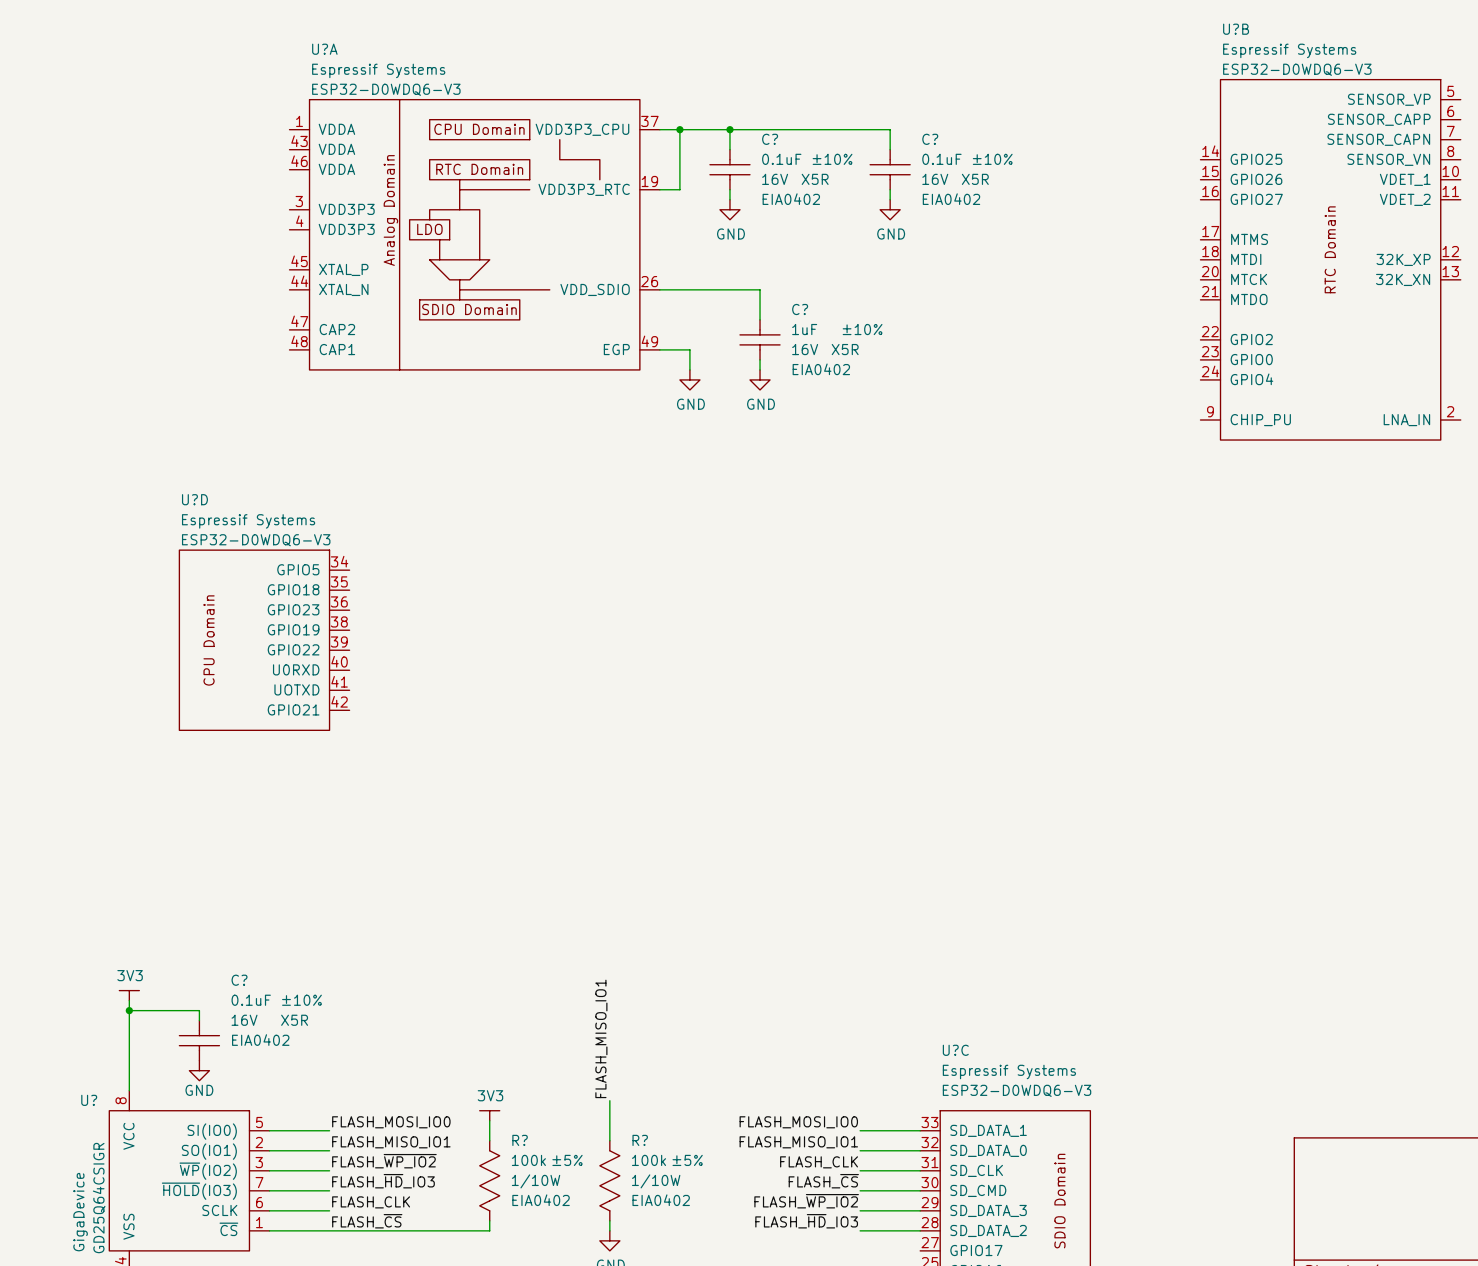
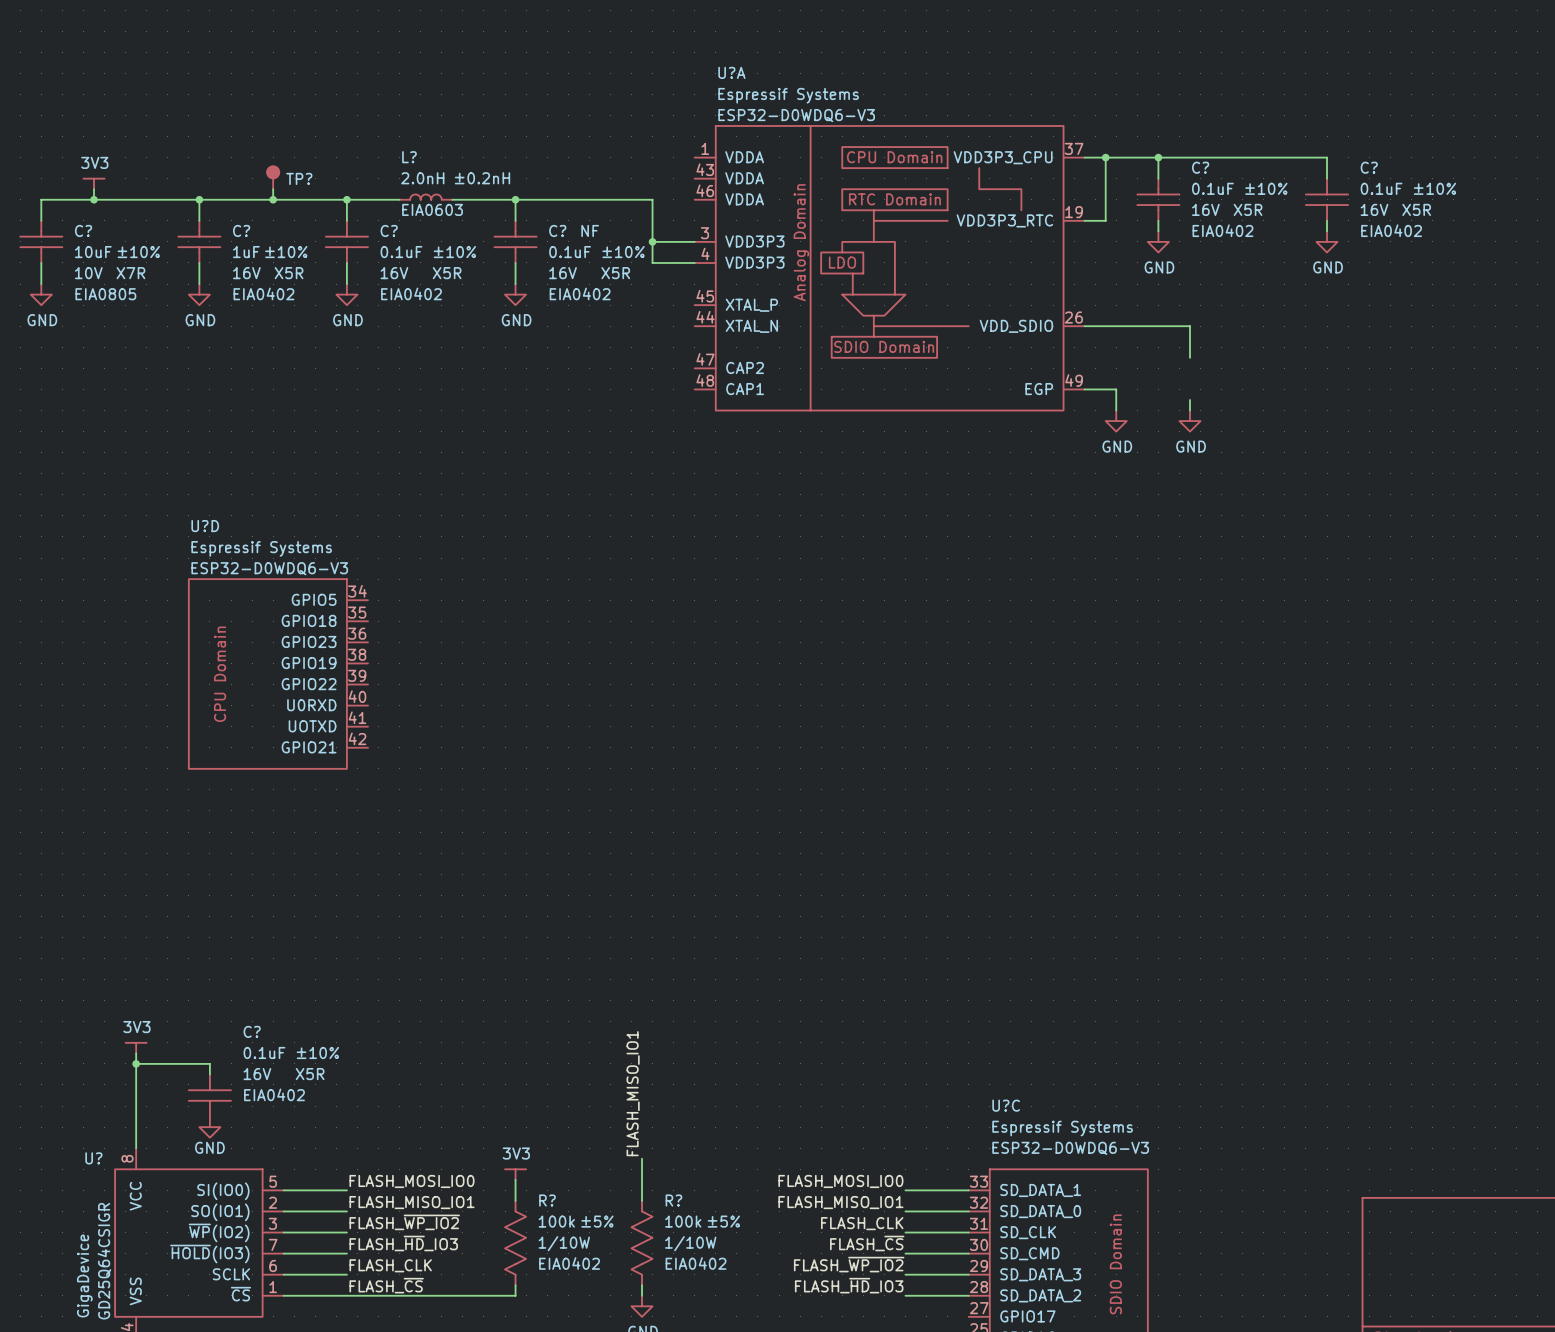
wire: (659, 129) (890, 129) (890, 149) -> none
junction: (679, 129) -> none
wire: (729, 129) (729, 149) -> none
junction: (729, 129) -> none
wire: none -> (1084, 157) (1327, 157) (1327, 178)
wire: none -> (1105, 157) (1105, 220) (1084, 220)
junction: none -> (1105, 157)
wire: none -> (1158, 157) (1158, 178)
junction: none -> (1158, 157)
TP?: none -> (273, 177)
C?: (729, 169) -> none
C?: (890, 169) -> none
power symbol: none -> 3V3 (94, 183)
wire: none -> (94, 189) (94, 199)
wire: none -> (273, 189) (273, 199)
L?: none -> (425, 197)
junction: none -> (94, 199)
wire: none -> (199, 199) (199, 220)
junction: none -> (199, 199)
junction: none -> (273, 199)
wire: none -> (346, 199) (346, 220)
junction: none -> (346, 199)
wire: none -> (399, 199) (41, 199) (41, 220)
wire: none -> (452, 199) (652, 199) (652, 262) (694, 262)
wire: none -> (515, 199) (515, 220)
junction: none -> (515, 199)
wire: (729, 189) (729, 199) -> none
wire: (890, 189) (890, 199) -> none
C?: none -> (1158, 199)
C?: none -> (1327, 199)
power symbol: GND (729, 209) -> none
power symbol: GND (890, 209) -> none
wire: none -> (1158, 220) (1158, 231)
wire: none -> (1327, 220) (1327, 231)
C?: none -> (41, 241)
C?: none -> (199, 241)
C?: none -> (346, 241)
C?: none -> (515, 241)
wire: none -> (652, 241) (694, 241)
junction: none -> (652, 241)
power symbol: none -> GND (1158, 241)
power symbol: none -> GND (1327, 241)
U?A: (474, 234) -> none
wire: none -> (41, 262) (41, 284)
wire: none -> (199, 262) (199, 284)
wire: none -> (346, 262) (346, 284)
wire: none -> (515, 262) (515, 284)
U?A: none -> (889, 268)
U?B: (1330, 259) -> none
power symbol: none -> GND (41, 294)
power symbol: none -> GND (199, 294)
power symbol: none -> GND (346, 294)
power symbol: none -> GND (515, 294)
wire: (659, 289) (760, 289) (760, 319) -> none
wire: none -> (1084, 326) (1190, 326) (1190, 357)
C?: (760, 339) -> none
wire: (659, 349) (689, 349) (689, 369) -> none
wire: (760, 359) (760, 369) -> none
wire: none -> (1084, 389) (1116, 389) (1116, 410)
power symbol: GND (689, 379) -> none
power symbol: GND (760, 379) -> none
wire: none -> (1190, 399) (1190, 410)
power symbol: none -> GND (1116, 421)
power symbol: none -> GND (1190, 421)

